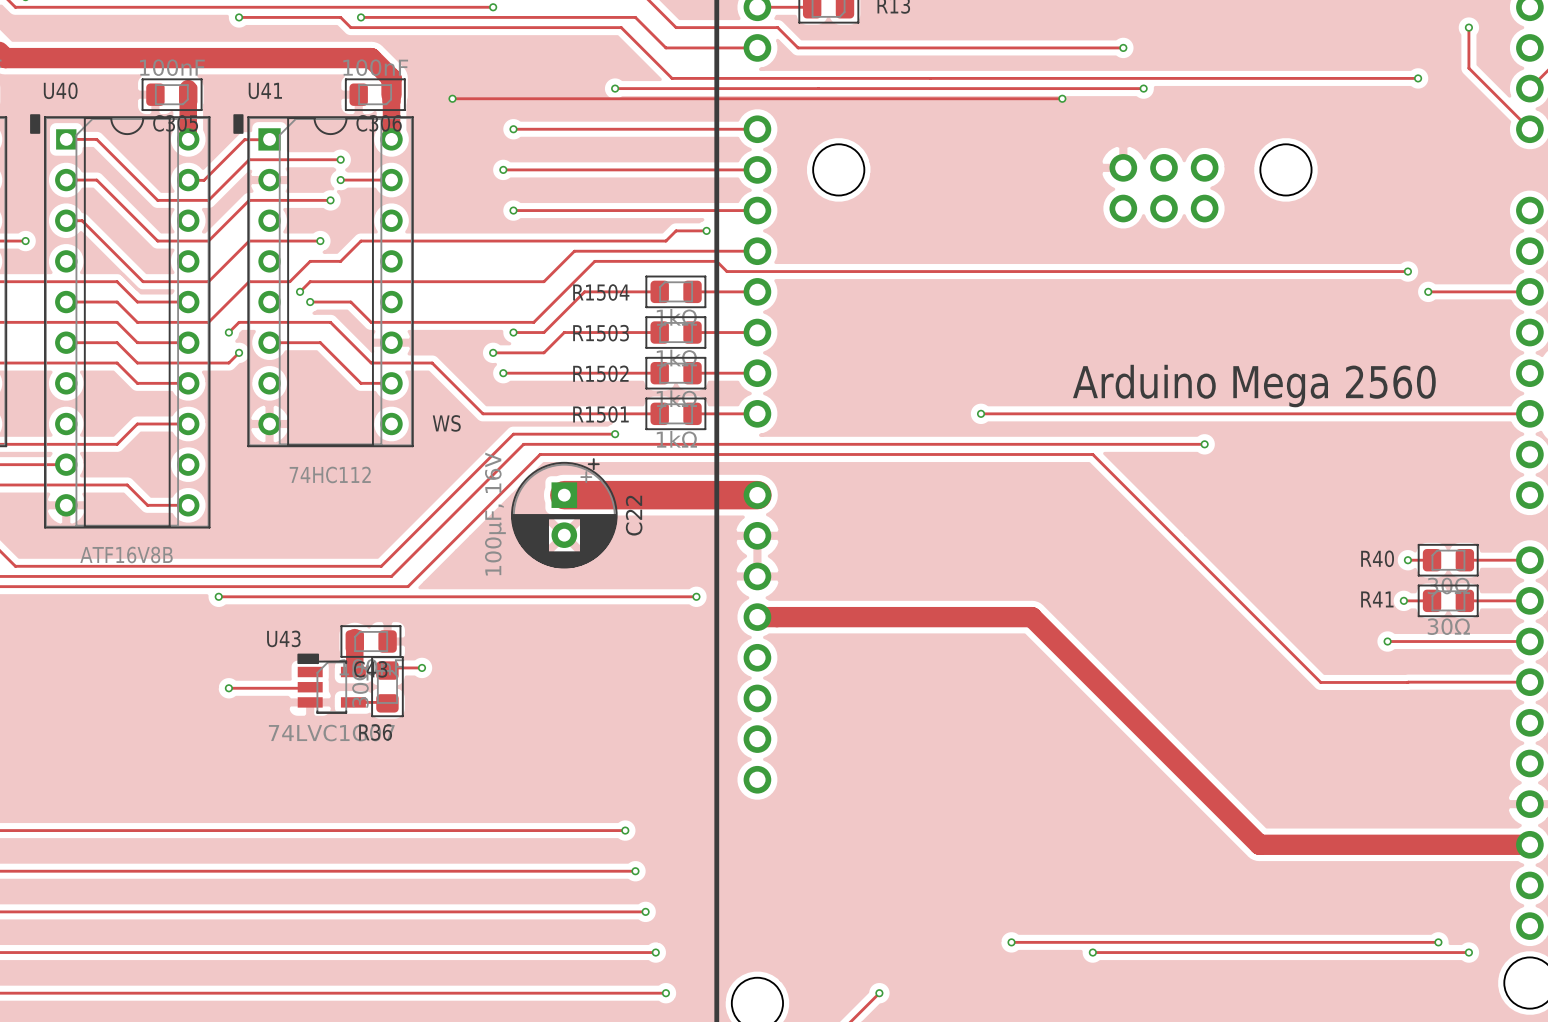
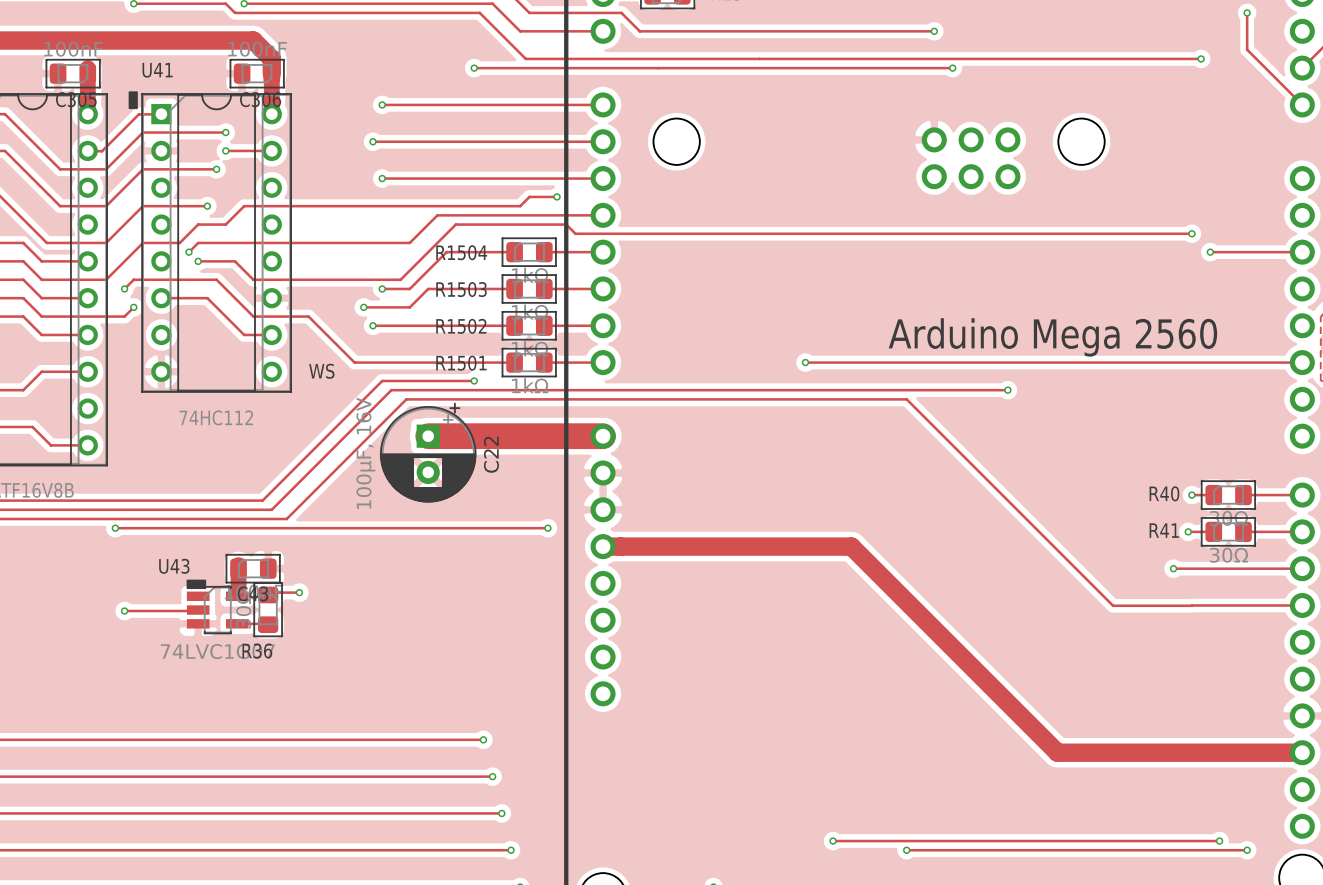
track: (452, 98) (1062, 98) -> none
via: (452, 98) -> none
via: (1062, 98) -> none

